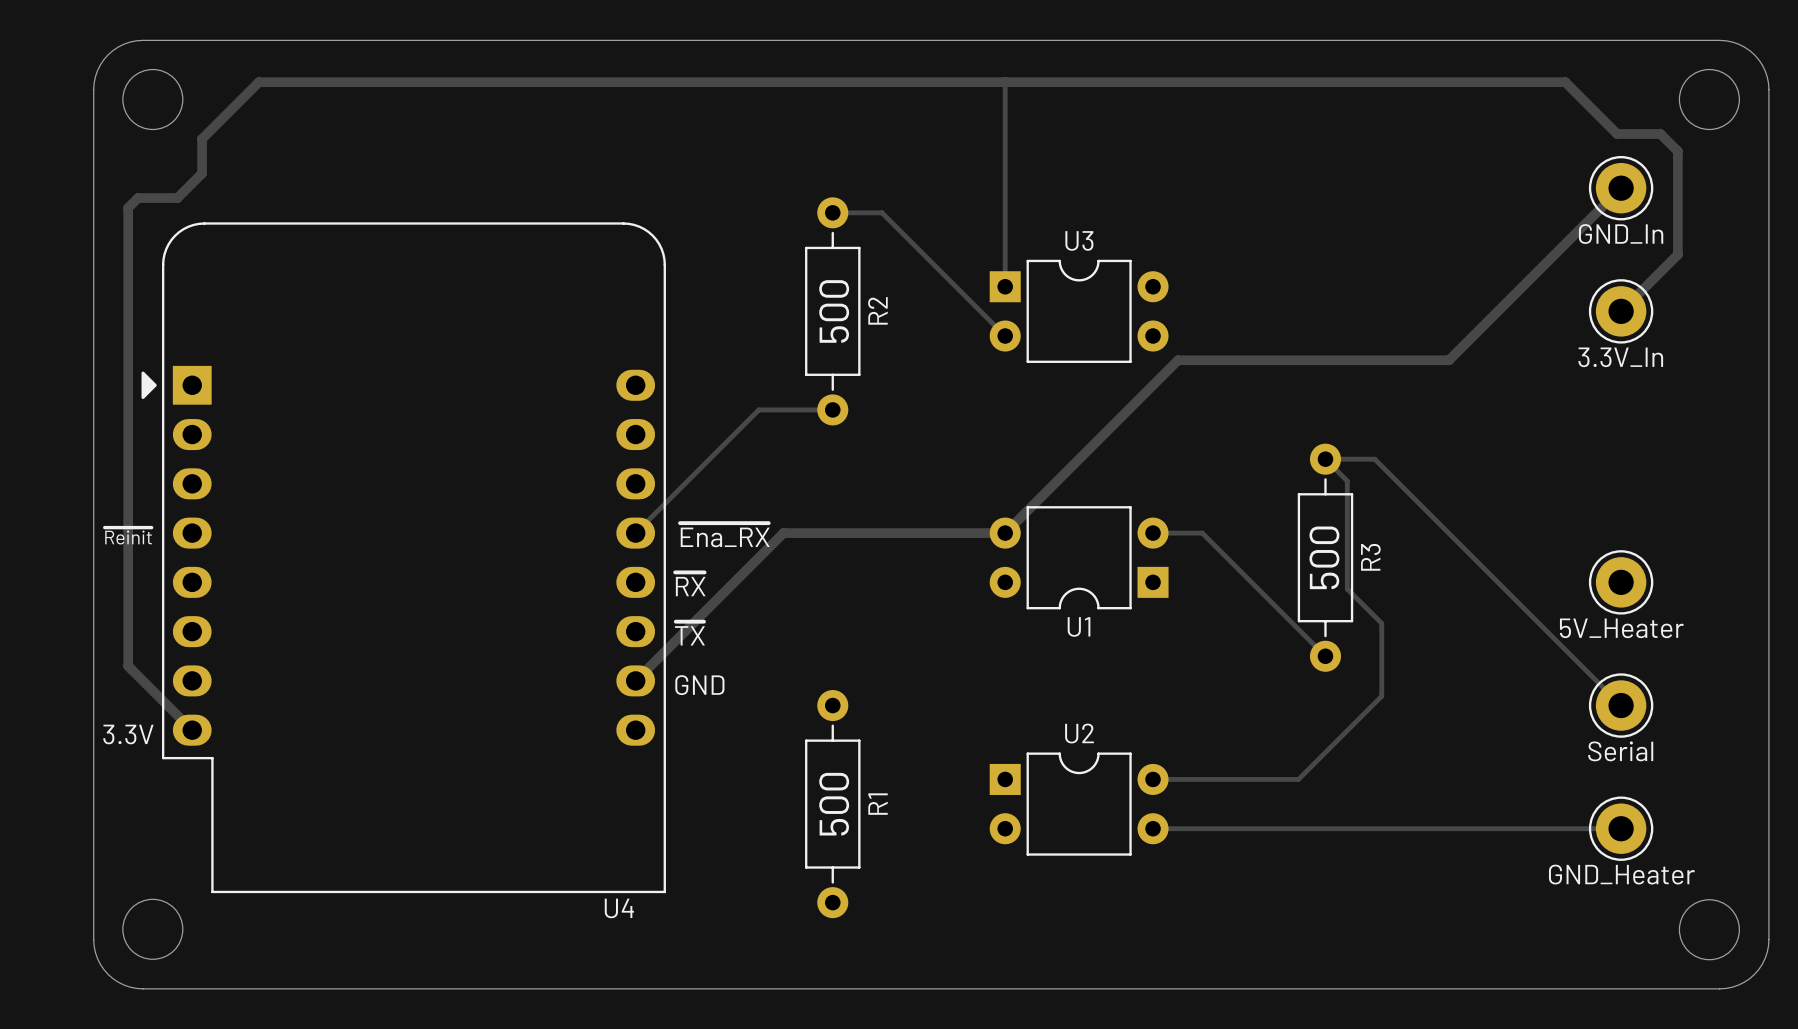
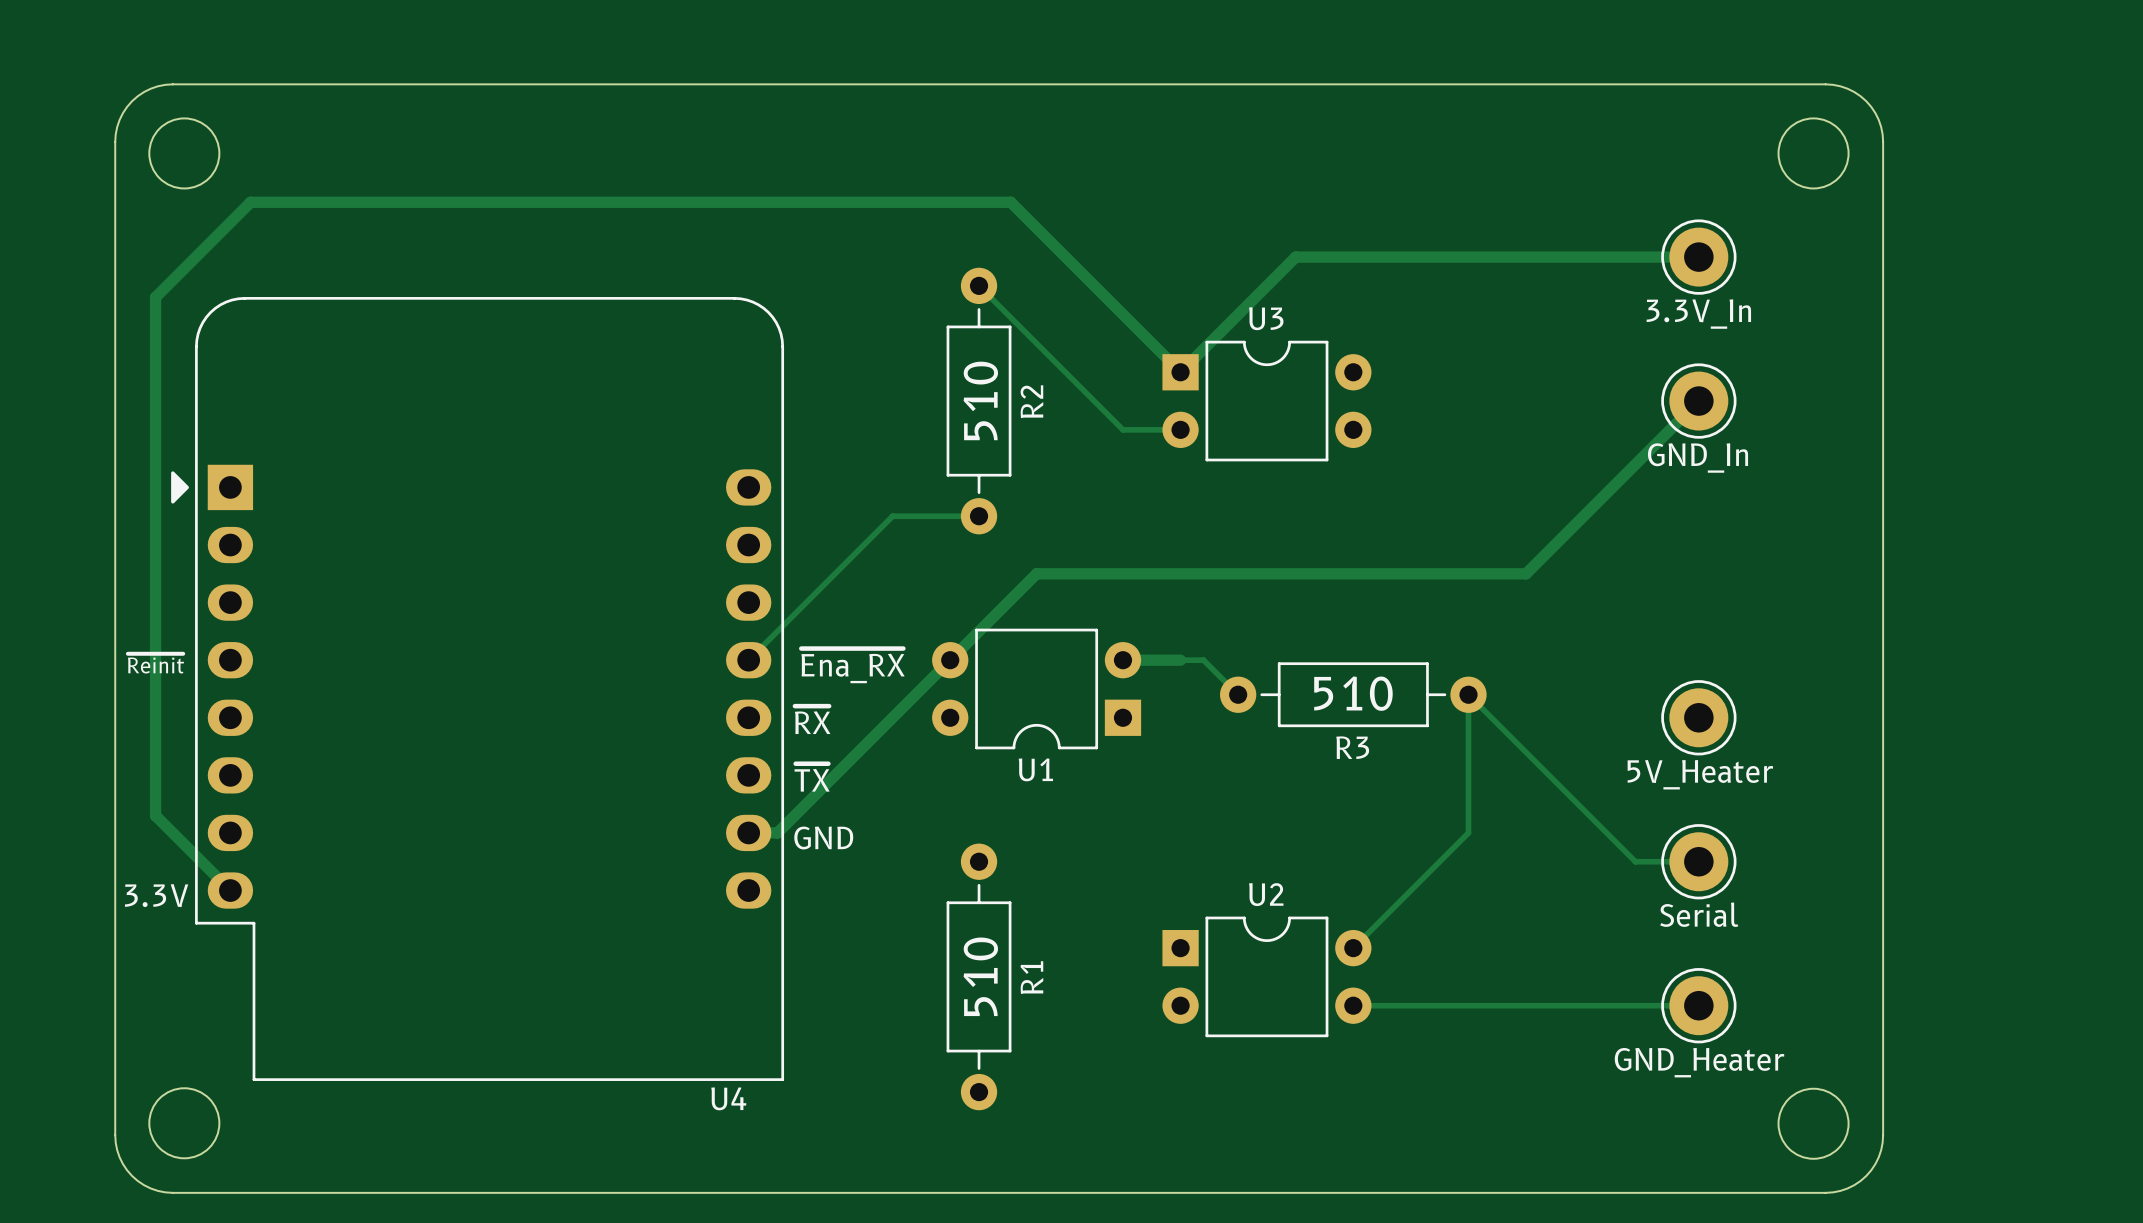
board edge: (1557, 40) (1719, 40) (1732, 42) (1749, 50) (1758, 59) (1767, 76) (1768, 89) (1768, 939) (1767, 952) (1762, 964) (1754, 974) (1738, 985) (1726, 988) (1557, 988) -> (1825, 84) (1847, 88) (1866, 101) (1878, 119) (1883, 141) (1883, 1135) (1878, 1157) (1866, 1176) (1847, 1188) (1825, 1192)
track: (1005, 82) (1005, 286) -> (1698, 257) (1295, 257) (1180, 372)
round board edge position: (1709, 99) -> (1813, 153)
track: (1621, 188) (1449, 360) (1178, 360) (1005, 533) -> (1238, 694) (1203, 660) (1180, 660)
GND_In position: (1621, 188) -> (1698, 401)
track: (832, 212) (882, 212) (1005, 336) -> (979, 285) (1122, 429) (1180, 429)
track: (128, 222) (128, 207) (138, 198) (177, 198) (202, 173) (202, 138) (258, 82) (1565, 82) (1617, 134) (1660, 134) (1677, 151) (1677, 254) (1621, 311) (1618, 308) -> (155, 297) (250, 202) (1010, 202) (1180, 372)
text: 500 (834, 311) -> 510 (980, 400)
3.3V_In position: (1621, 311) -> (1698, 257)
track: (955, 533) (783, 533) (635, 680) -> (1698, 401) (1526, 573) (1036, 573) (777, 832) (748, 832)
track: (1153, 533) (1202, 533) (1325, 656) -> none
U1 position: (1079, 557) -> (1036, 688)
text: 500 (1324, 557) -> none
R3 rotation: 0° (1325, 557) -> 90° clockwise (1353, 694)
R3 position: (1325, 557) -> (1353, 694)
text: none -> 510 (1353, 693)
5V_Heater position: (1621, 582) -> (1698, 717)
track: (1621, 705) (1374, 459) (1325, 459) (1347, 481) (1347, 589) (1381, 623) (1381, 696) (1298, 779) (1153, 779) -> (1698, 861) (1635, 861) (1468, 694) (1468, 832) (1353, 948)
Serial position: (1621, 705) -> (1698, 861)
text: 500 (834, 804) -> 510 (980, 976)
track: (1448, 828) (1621, 828) -> none
GND_Heater position: (1621, 828) -> (1698, 1005)
round board edge position: (1709, 929) -> (1813, 1123)

